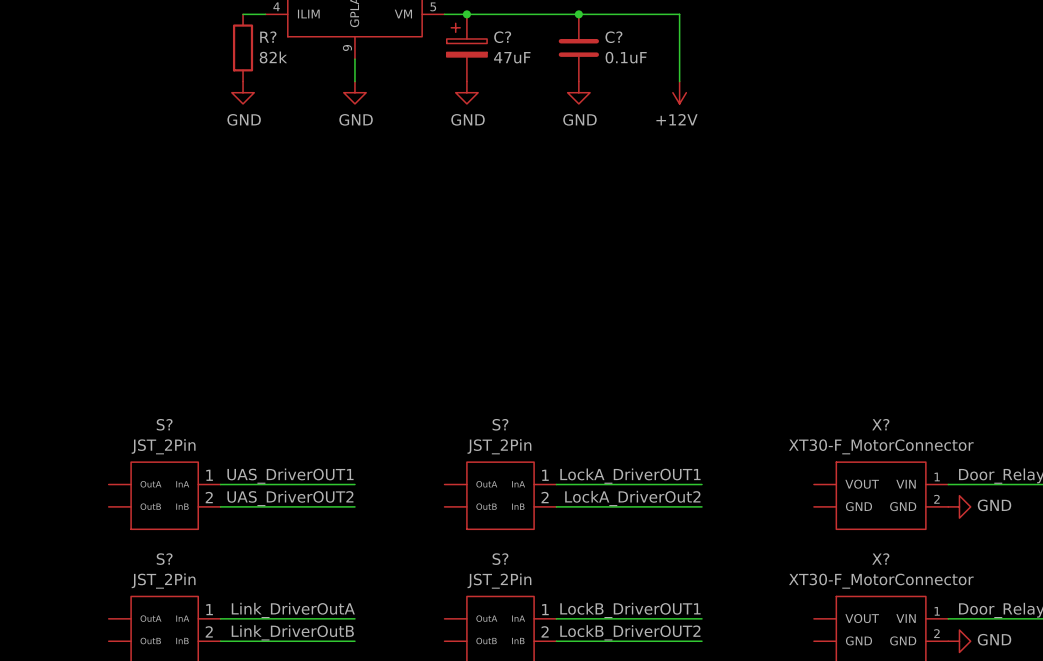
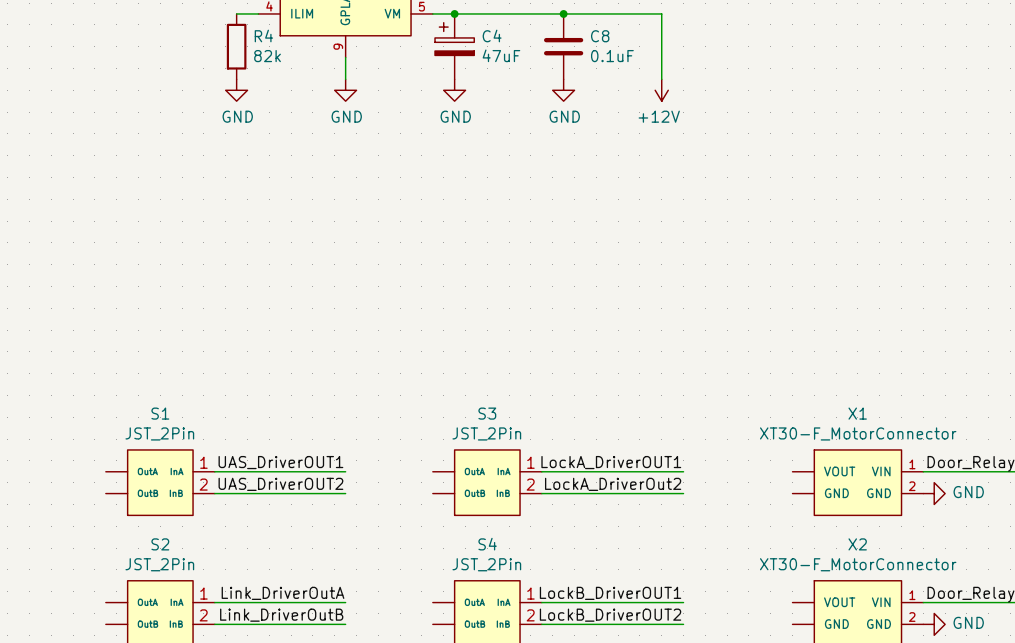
R? name: R? (268, 37) -> R4 (263, 35)
C? name: C? (502, 37) -> C4 (492, 35)
C? name: C? (613, 37) -> C8 (600, 36)
S? name: S? (164, 424) -> S1 (160, 413)
S? name: S? (500, 424) -> S3 (487, 413)
X? name: X? (880, 424) -> X1 (857, 413)
S? name: S? (164, 559) -> S2 (160, 544)
S? name: S? (500, 559) -> S4 (487, 544)
X? name: X? (880, 559) -> X2 (857, 544)

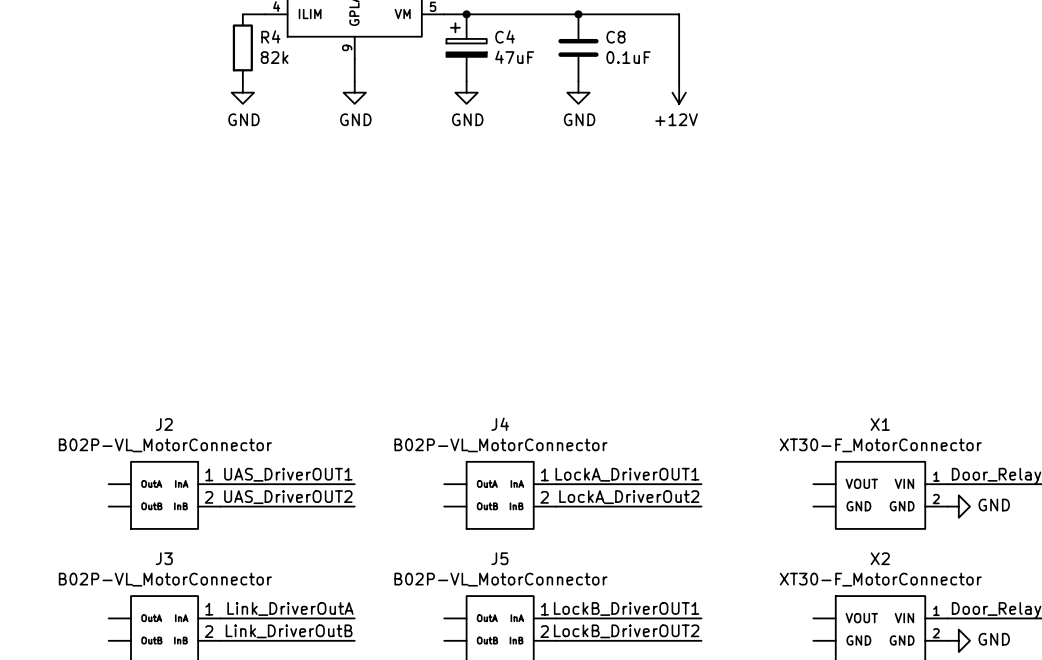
S1 name: S1 (160, 413) -> J2 (164, 424)
S3 name: S3 (487, 413) -> J4 (500, 424)
S1 value: JST_2Pin (159, 433) -> B02P-VL_MotorConnector (165, 445)
S3 value: JST_2Pin (486, 433) -> B02P-VL_MotorConnector (500, 445)
S2 name: S2 (160, 544) -> J3 (164, 558)
S4 name: S4 (487, 544) -> J5 (499, 558)
S2 value: JST_2Pin (159, 564) -> B02P-VL_MotorConnector (165, 579)
S4 value: JST_2Pin (486, 564) -> B02P-VL_MotorConnector (500, 579)

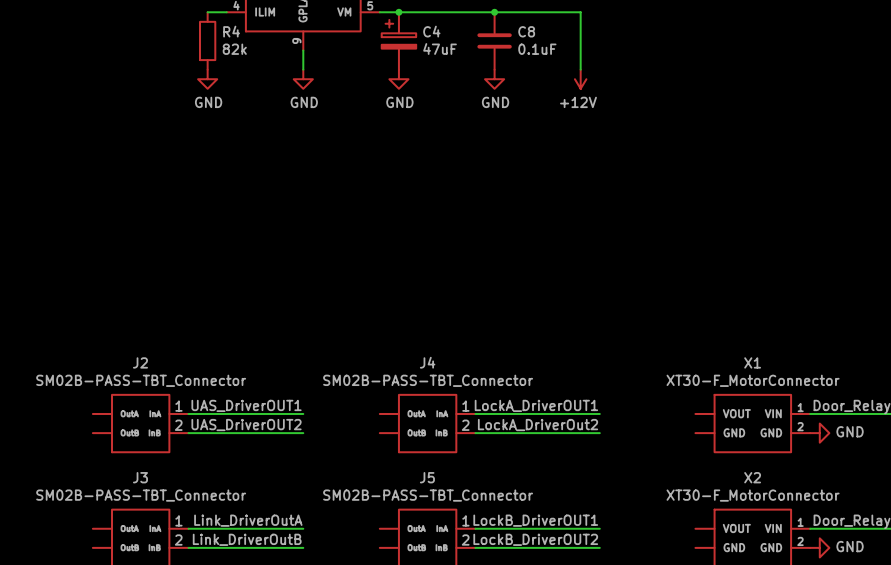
J2 value: B02P-VL_MotorConnector (165, 445) -> SM02B-PASS-TBT_Connector (141, 380)
J4 value: B02P-VL_MotorConnector (500, 445) -> SM02B-PASS-TBT_Connector (428, 380)
J3 value: B02P-VL_MotorConnector (165, 579) -> SM02B-PASS-TBT_Connector (141, 495)
J5 value: B02P-VL_MotorConnector (500, 579) -> SM02B-PASS-TBT_Connector (428, 495)

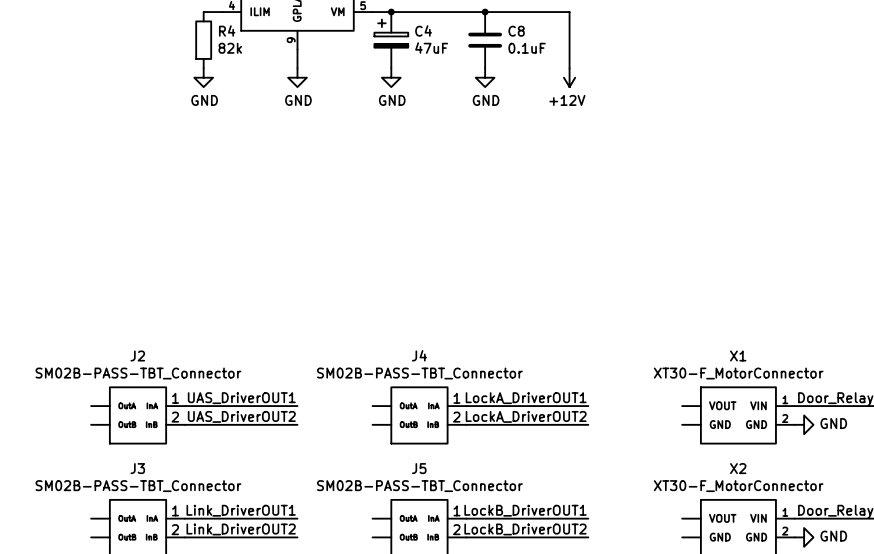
label: LockA_DriverOut2 (538, 425) -> LockA_DriverOUT2 (526, 416)
label: Link_DriverOutA (248, 520) -> Link_DriverOUT1 (241, 510)
label: Link_DriverOutB (247, 539) -> Link_DriverOUT2 (241, 529)

